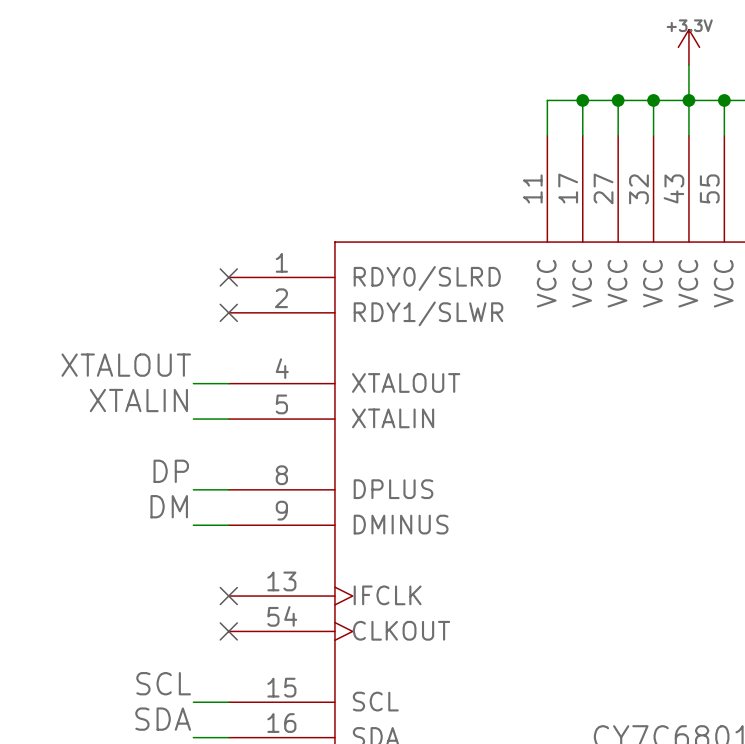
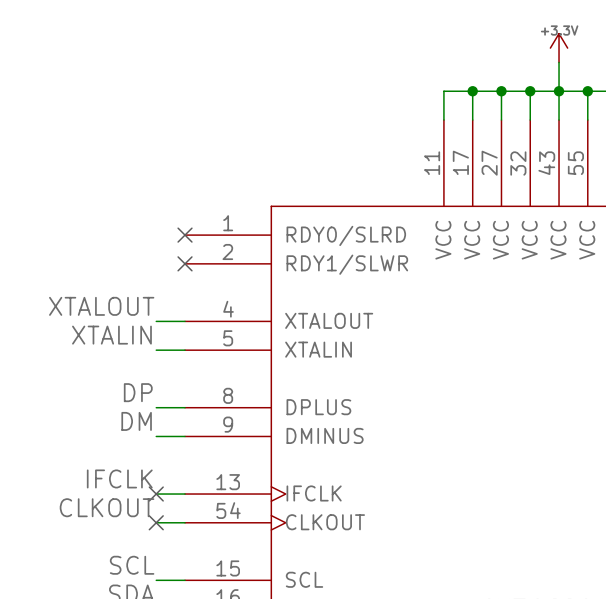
label: none -> IFCLK (119, 478)
wire: none -> (156, 494) (185, 494)
no-connect mark: none -> (156, 494)
no-connect mark: (228, 596) -> none
label: none -> CLKOUT (107, 507)
wire: none -> (156, 522) (185, 522)
no-connect mark: none -> (156, 522)
no-connect mark: (228, 631) -> none

